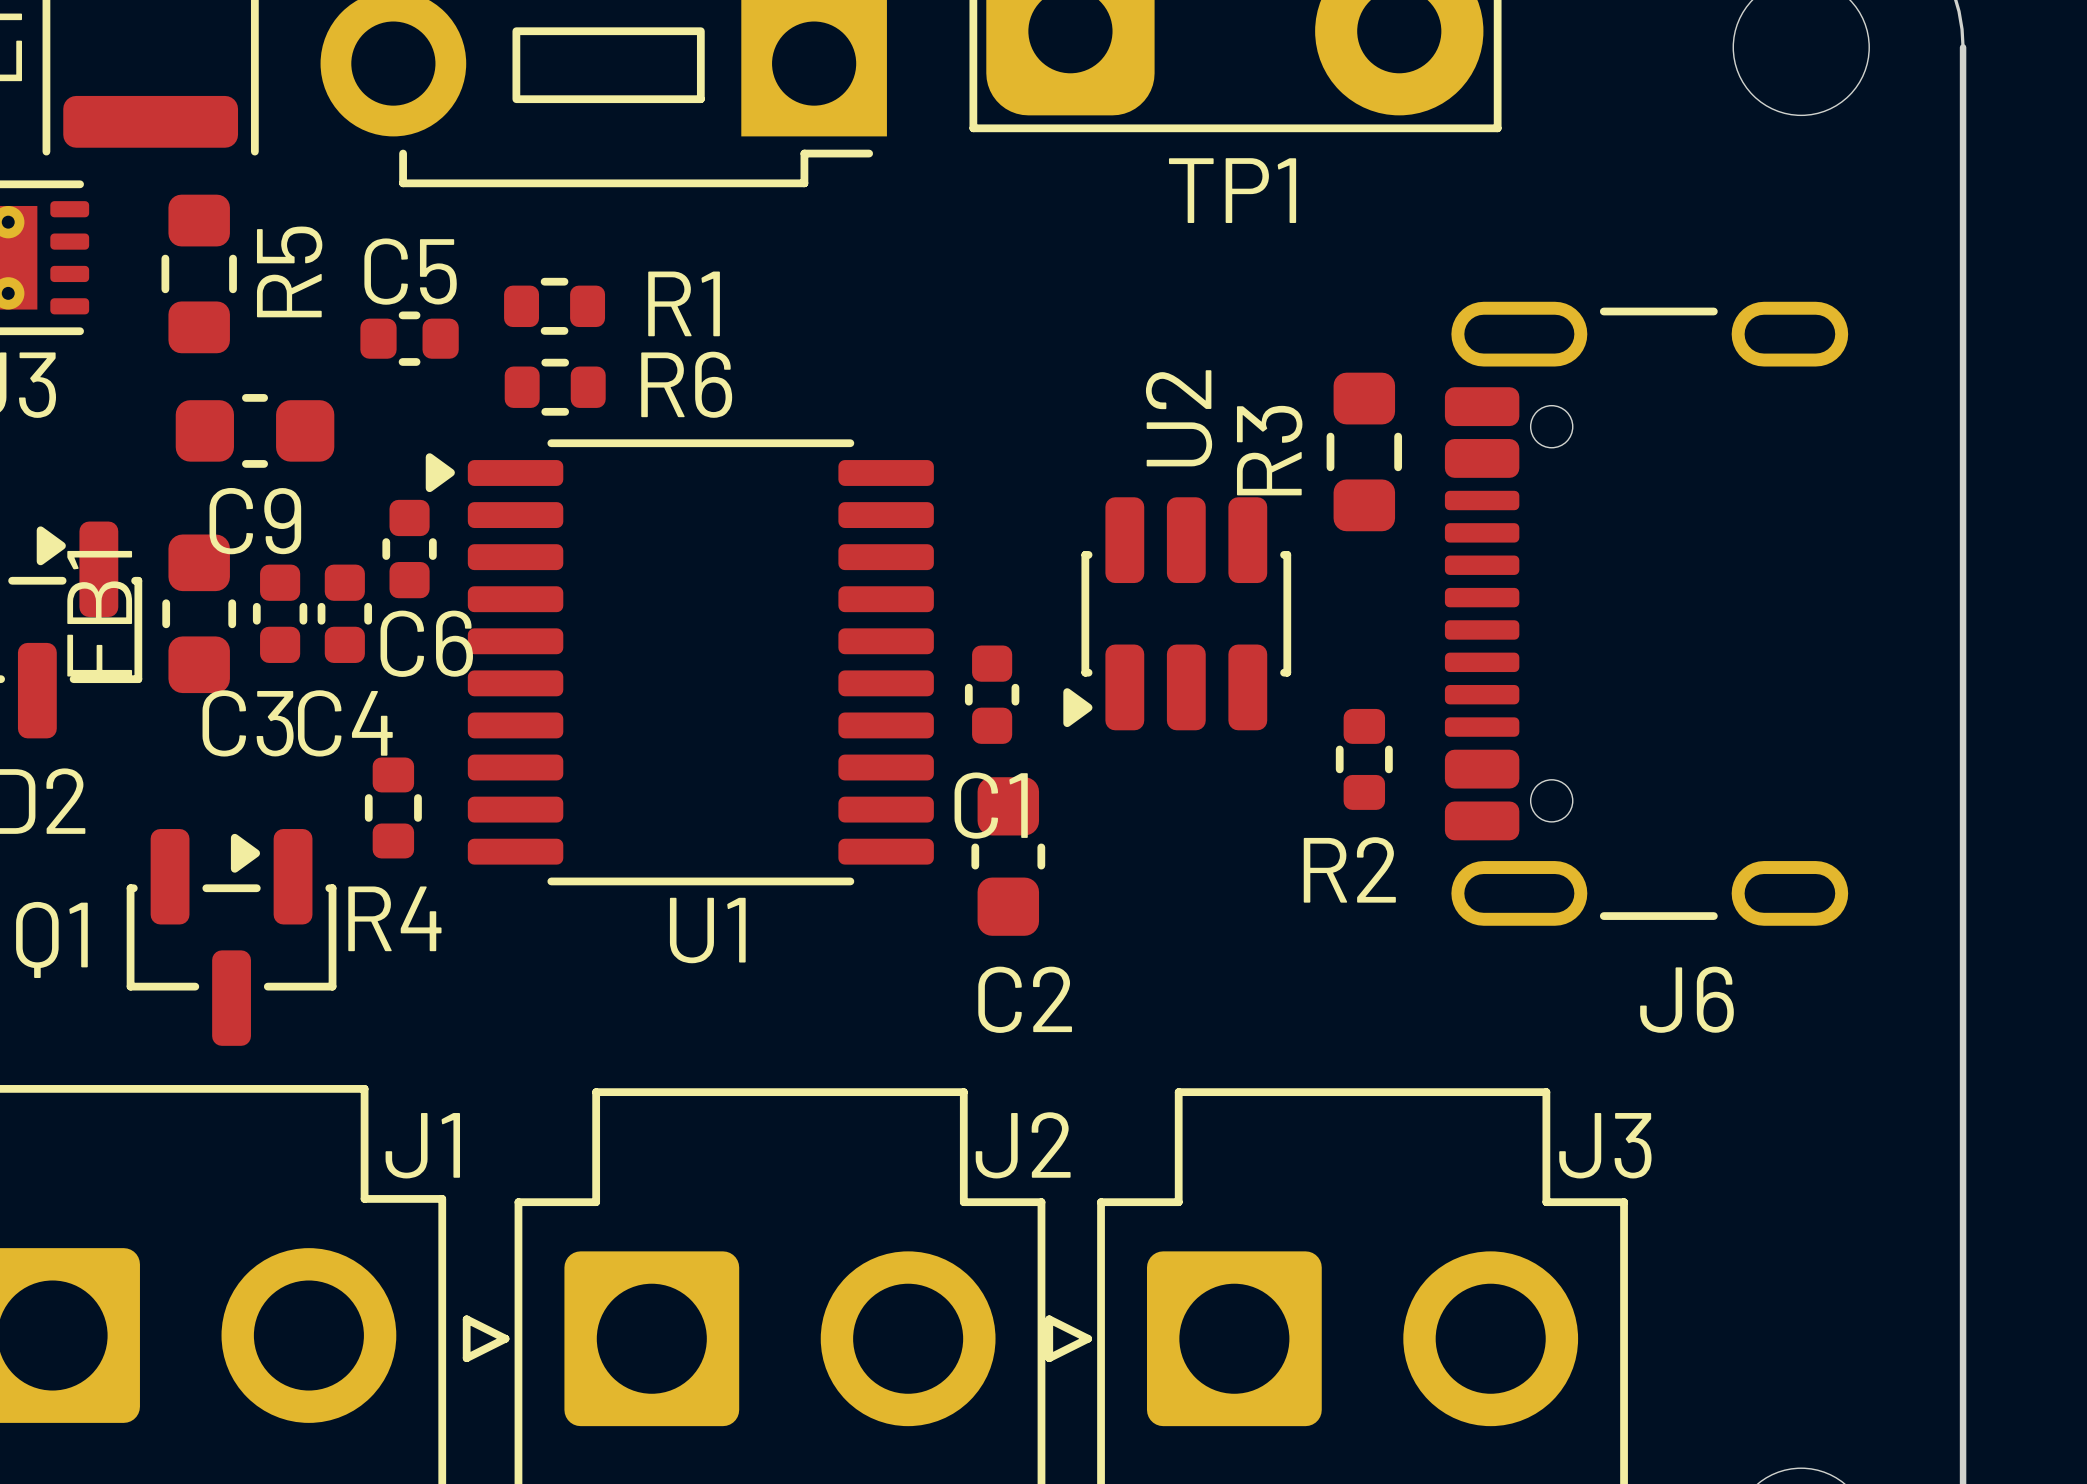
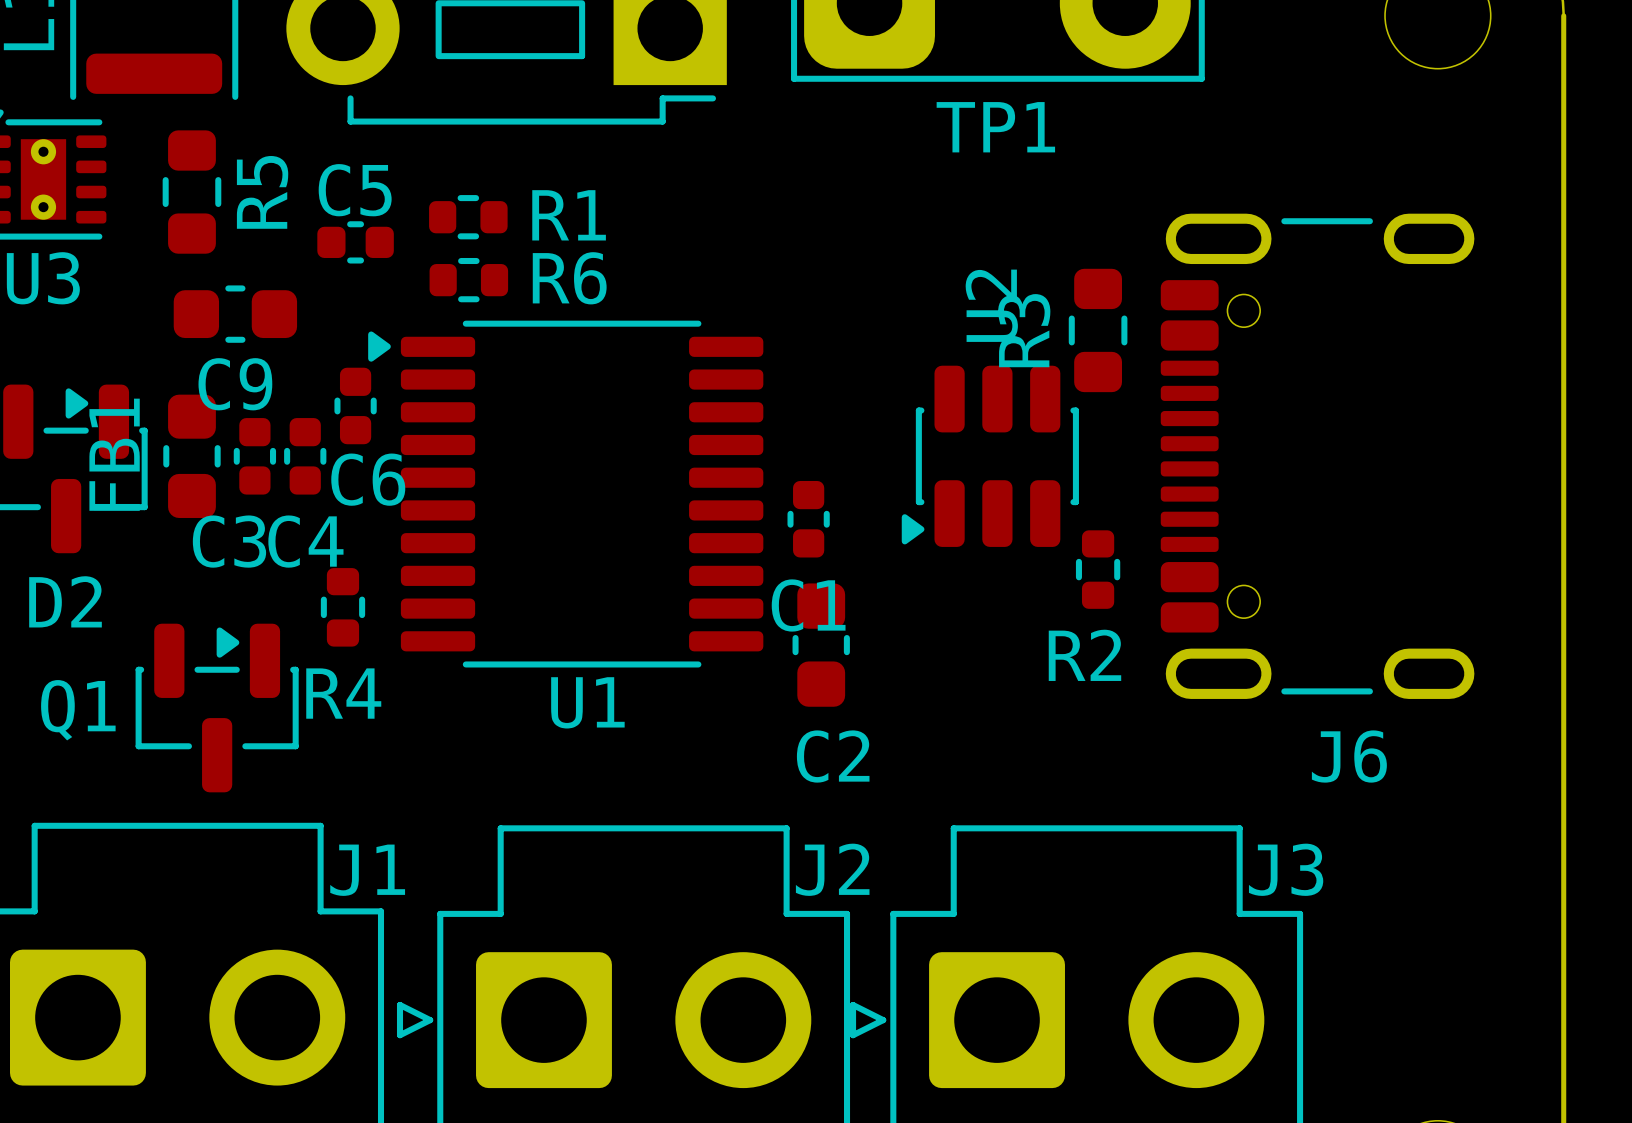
U2 position: (1177, 613) -> (990, 456)

